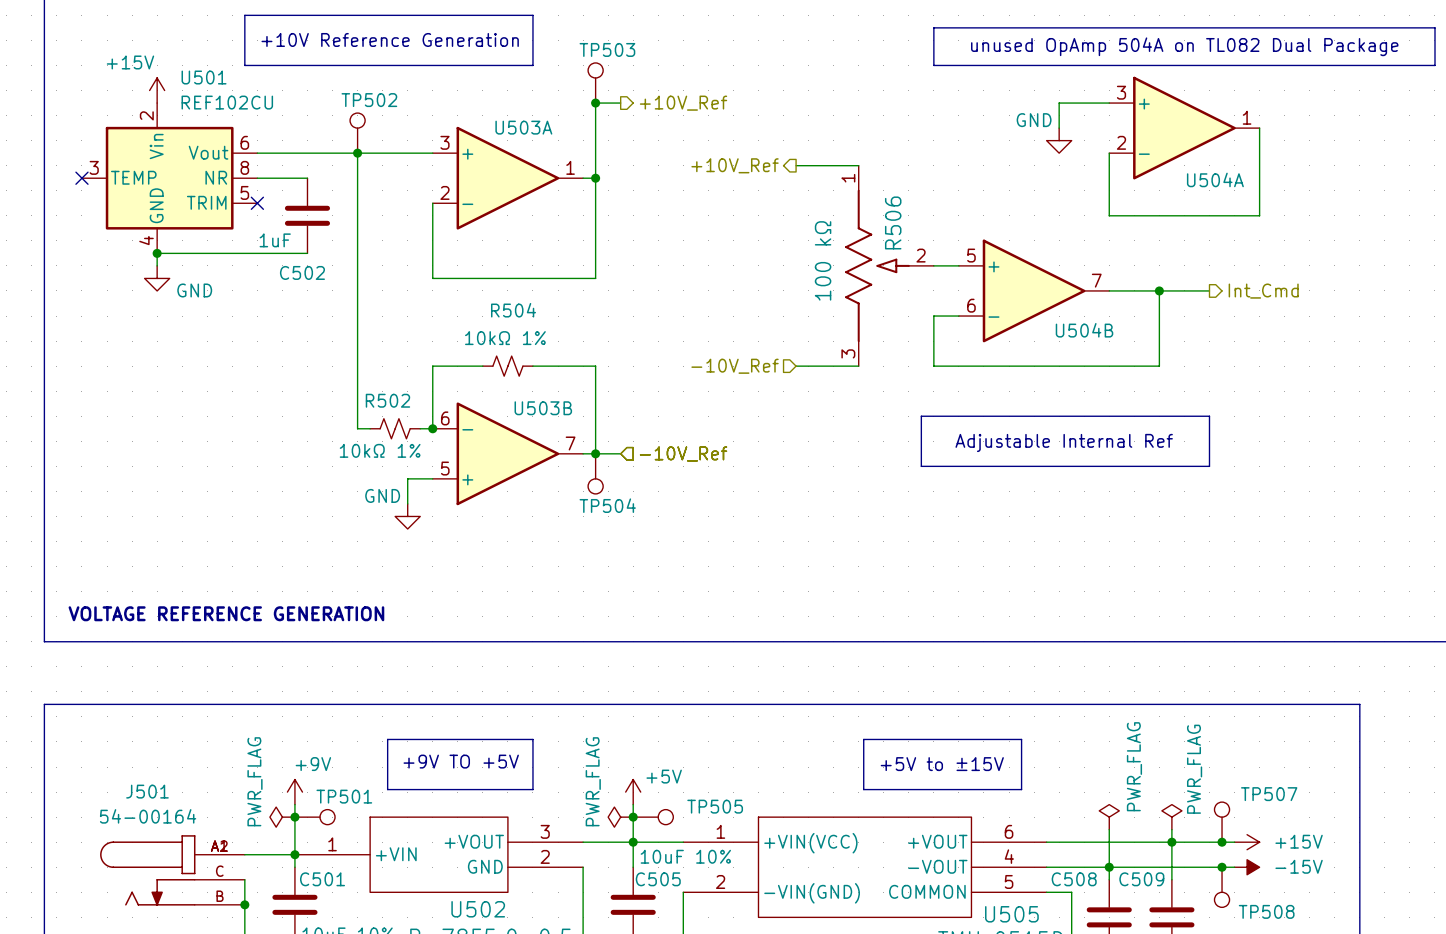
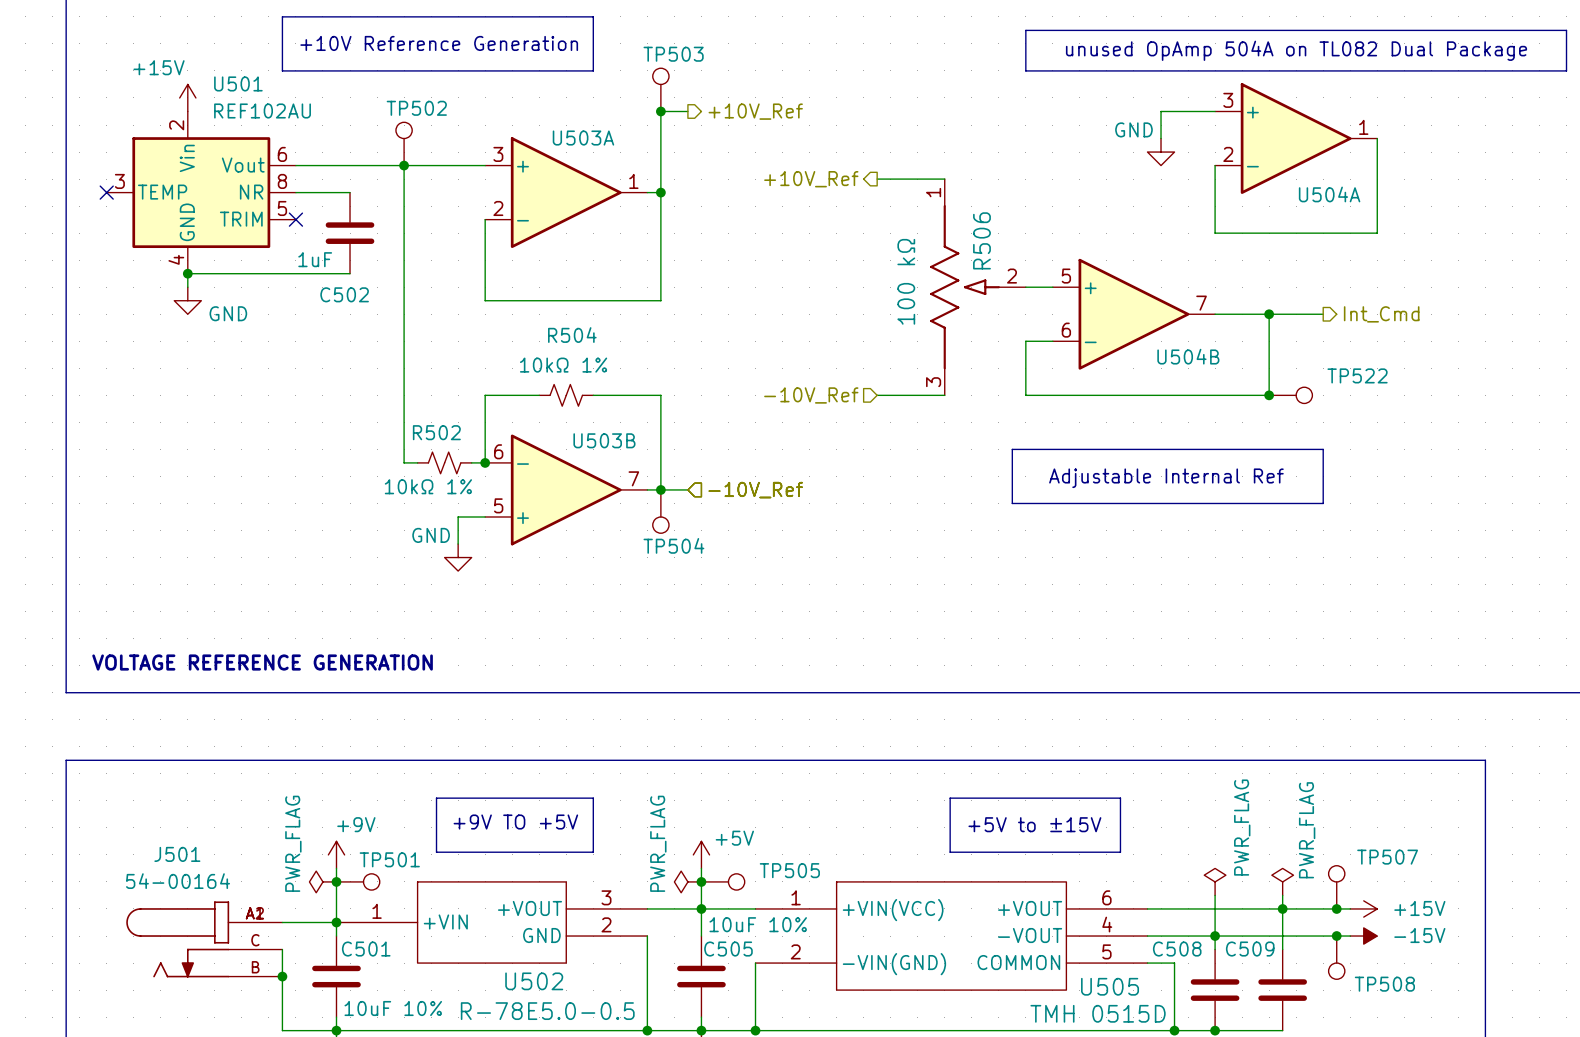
U501 value: REF102CU (227, 102) -> REF102AU (262, 110)
junction: none -> (1269, 395)
TP522: none -> (1290, 395)

